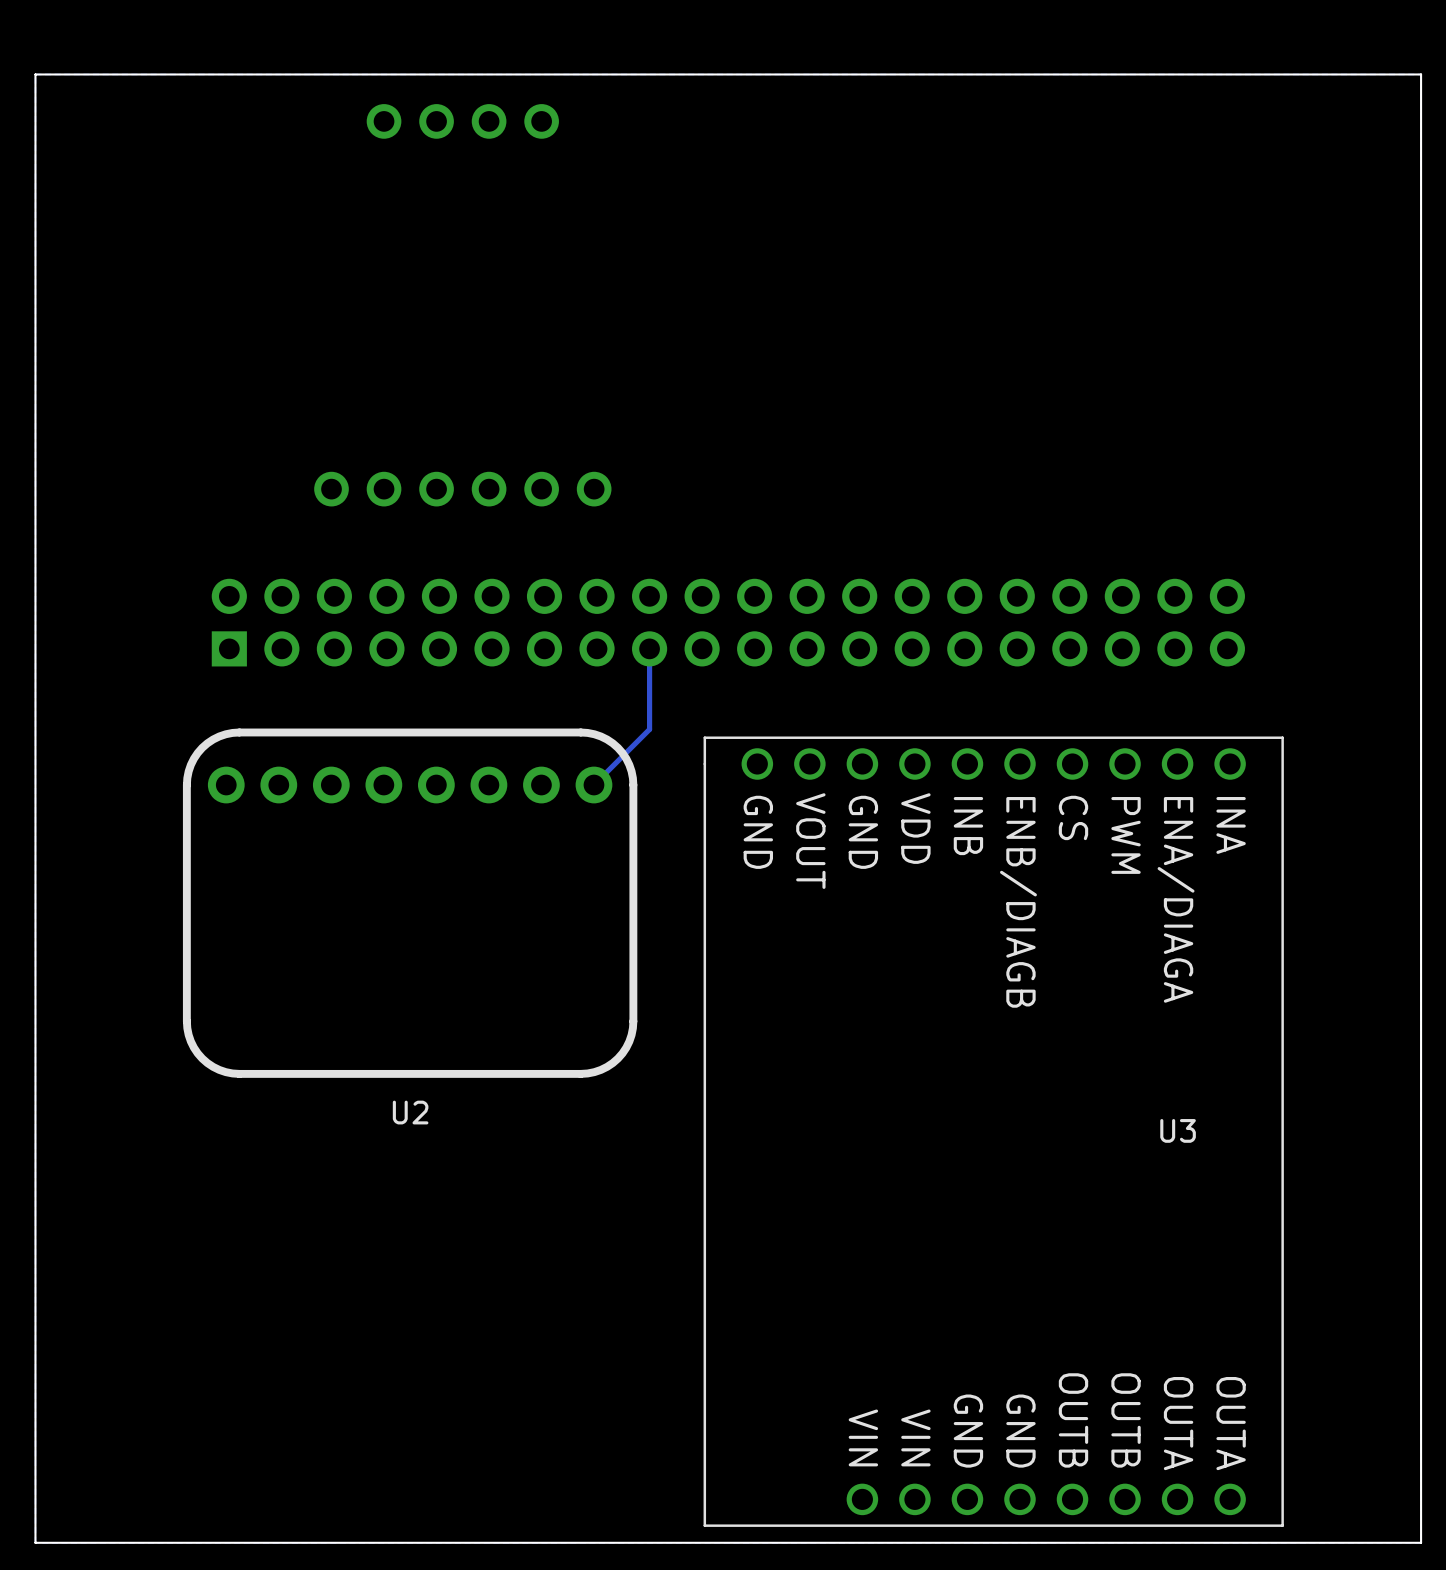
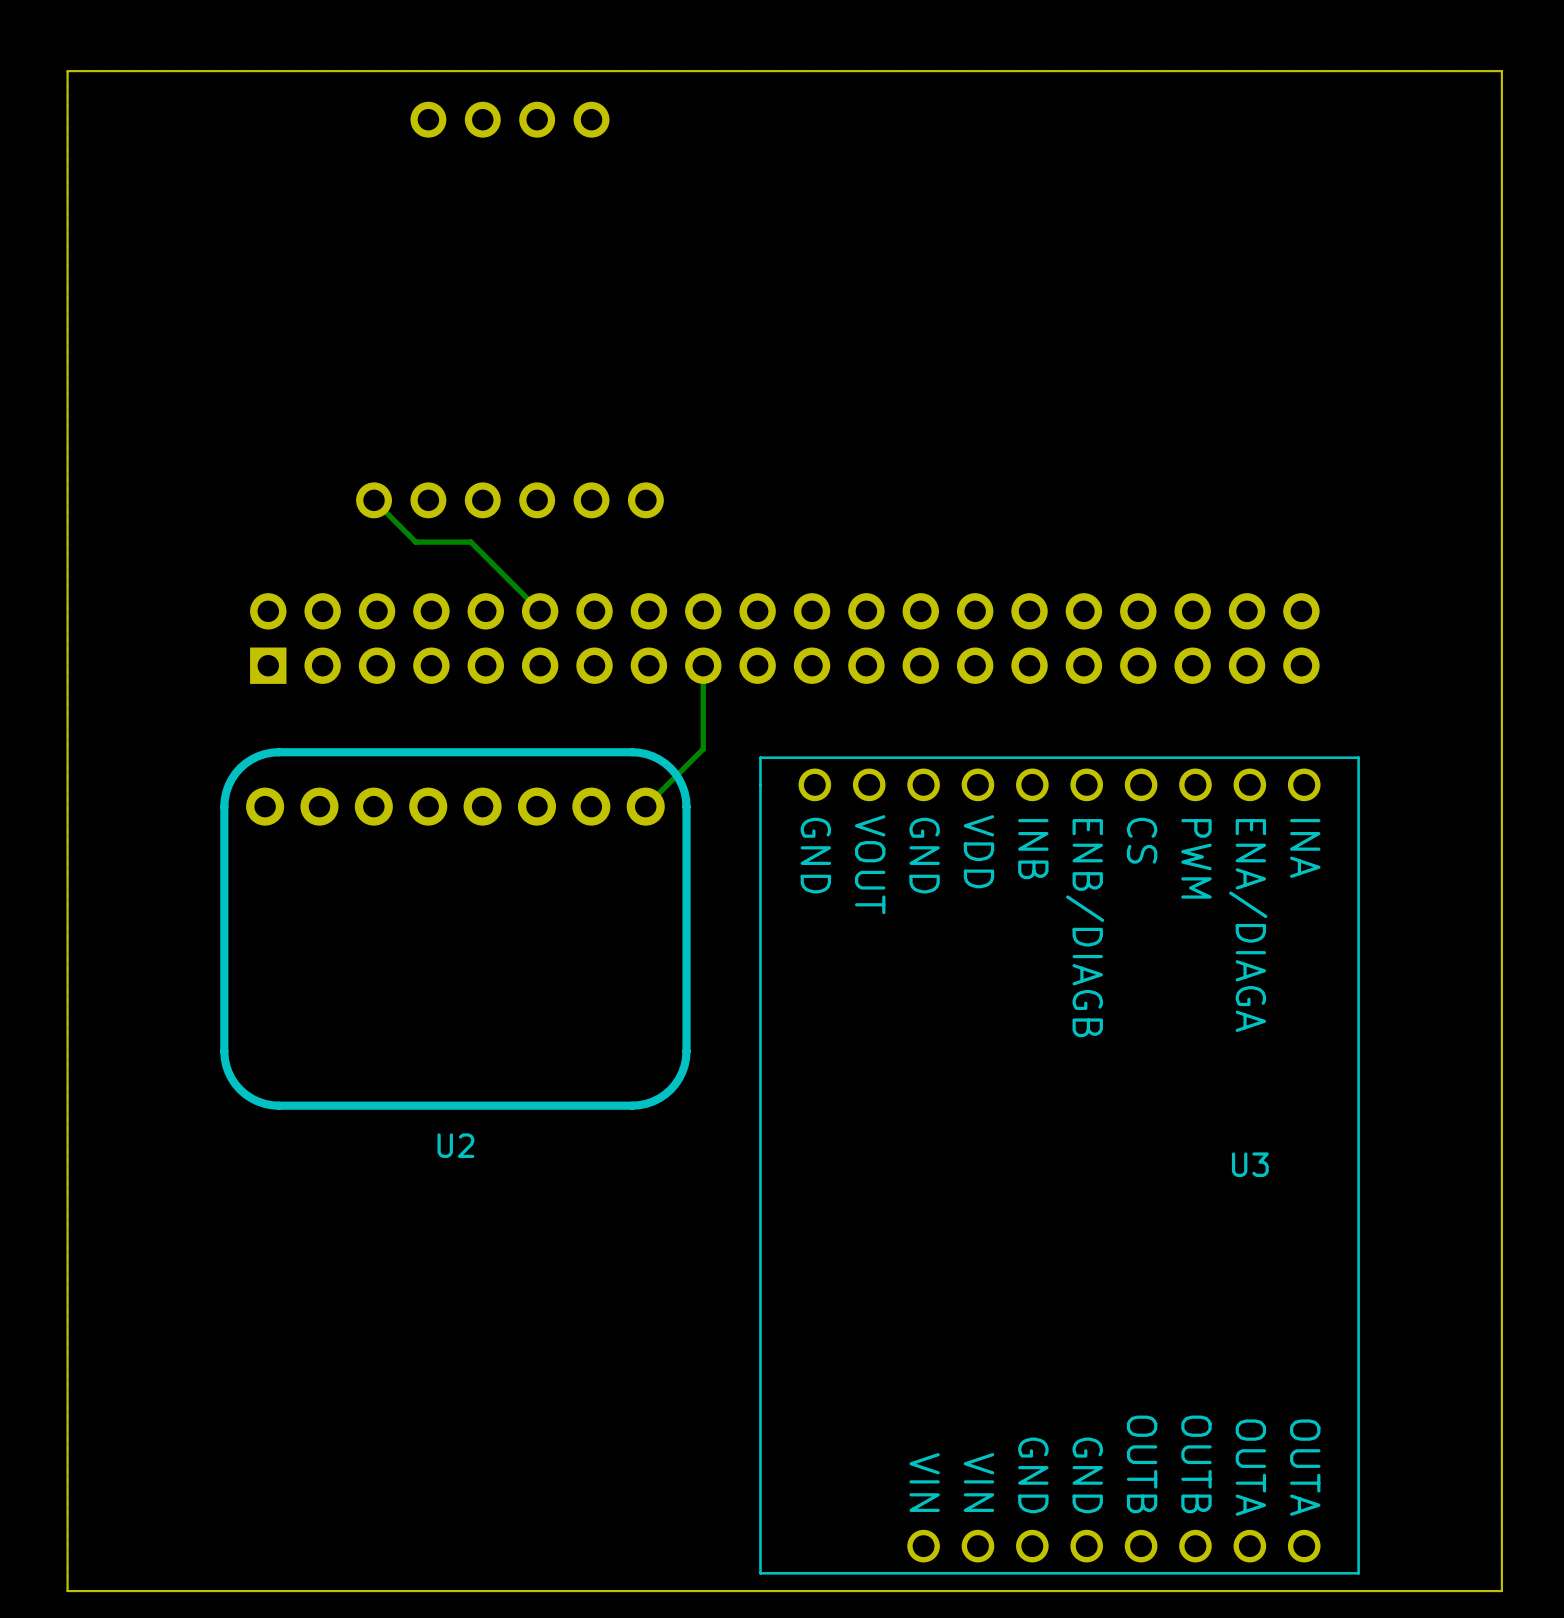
track: none -> (374, 500) (415, 542) (470, 542) (540, 611)

